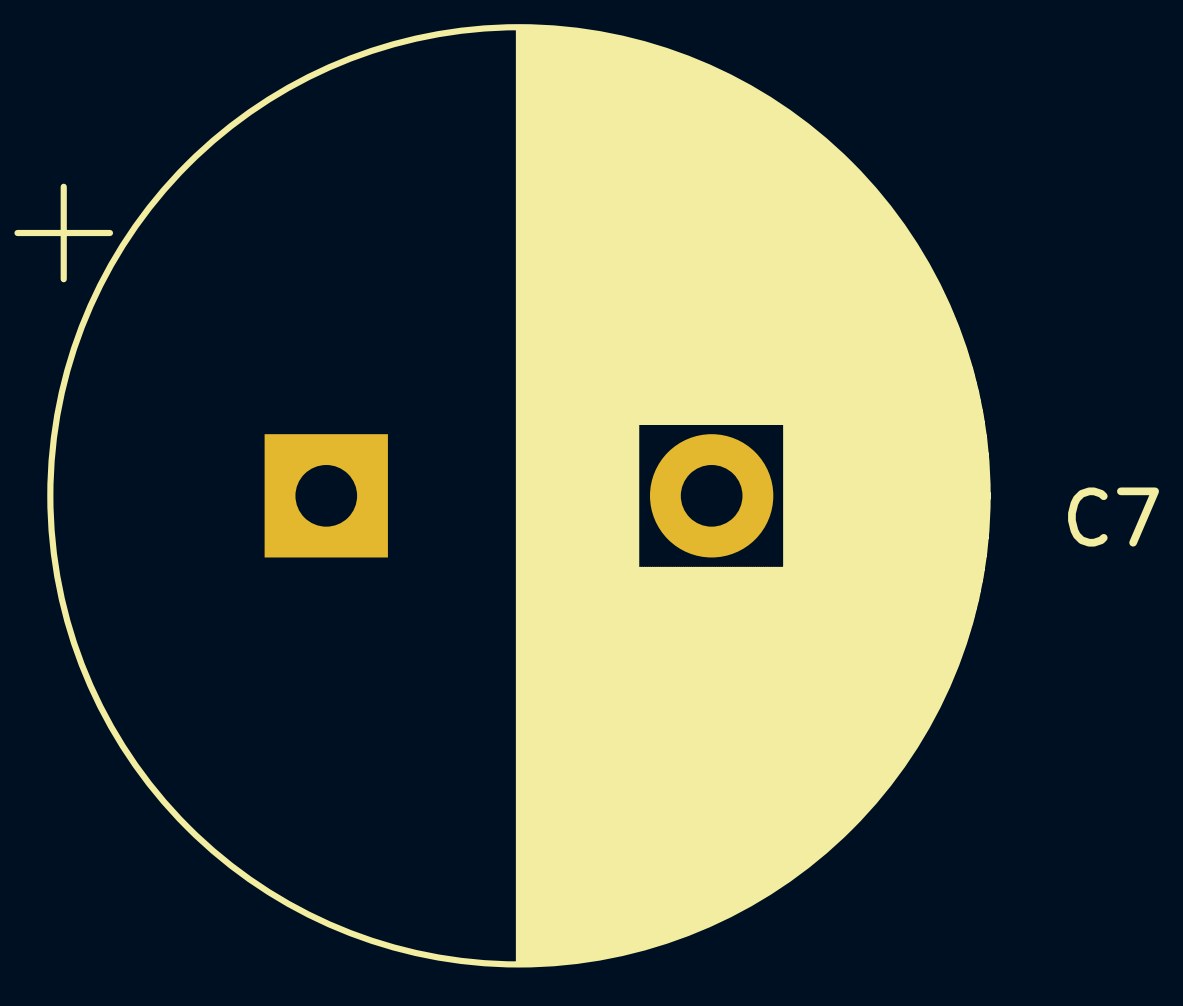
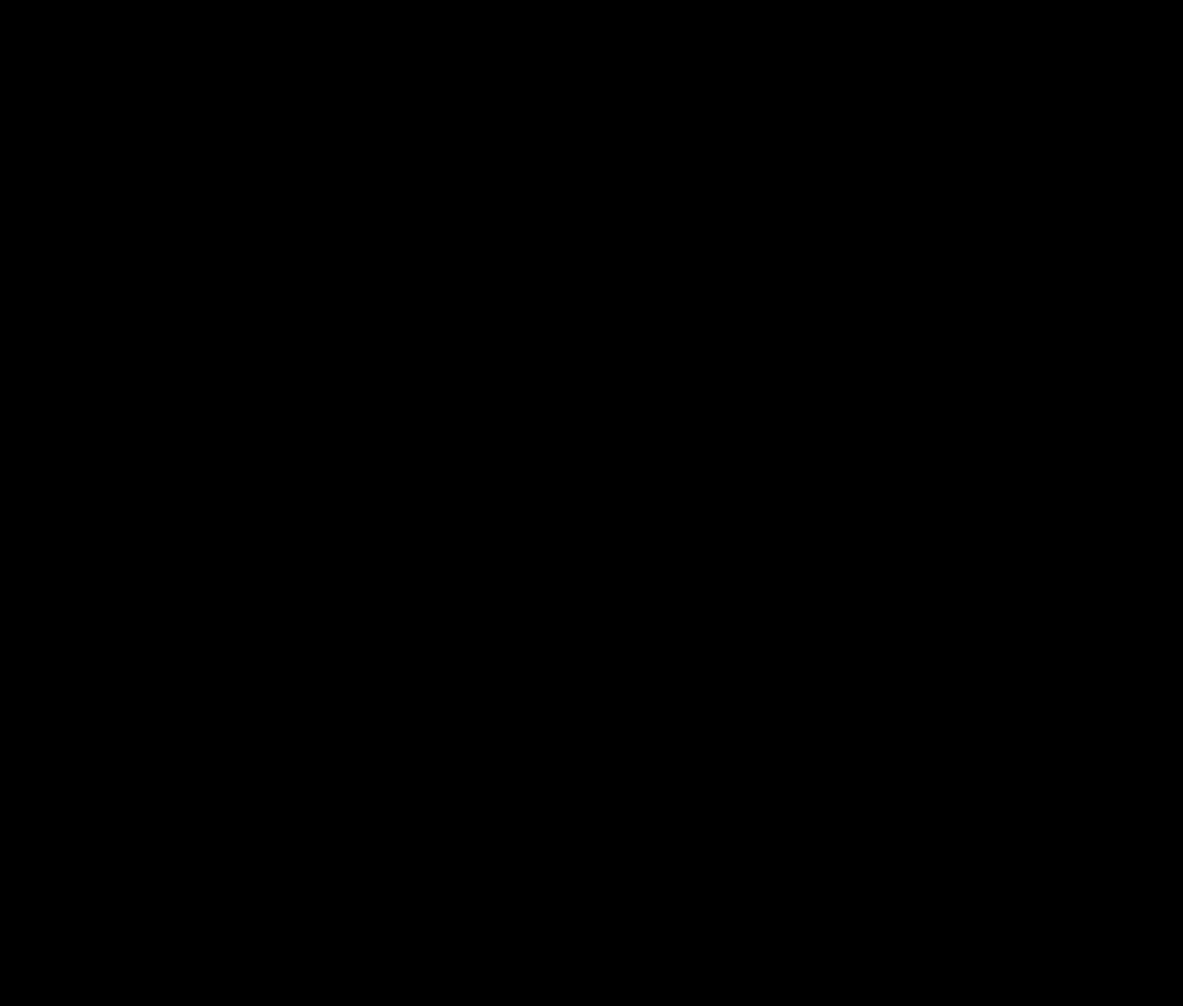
C7: (502, 495) -> none

